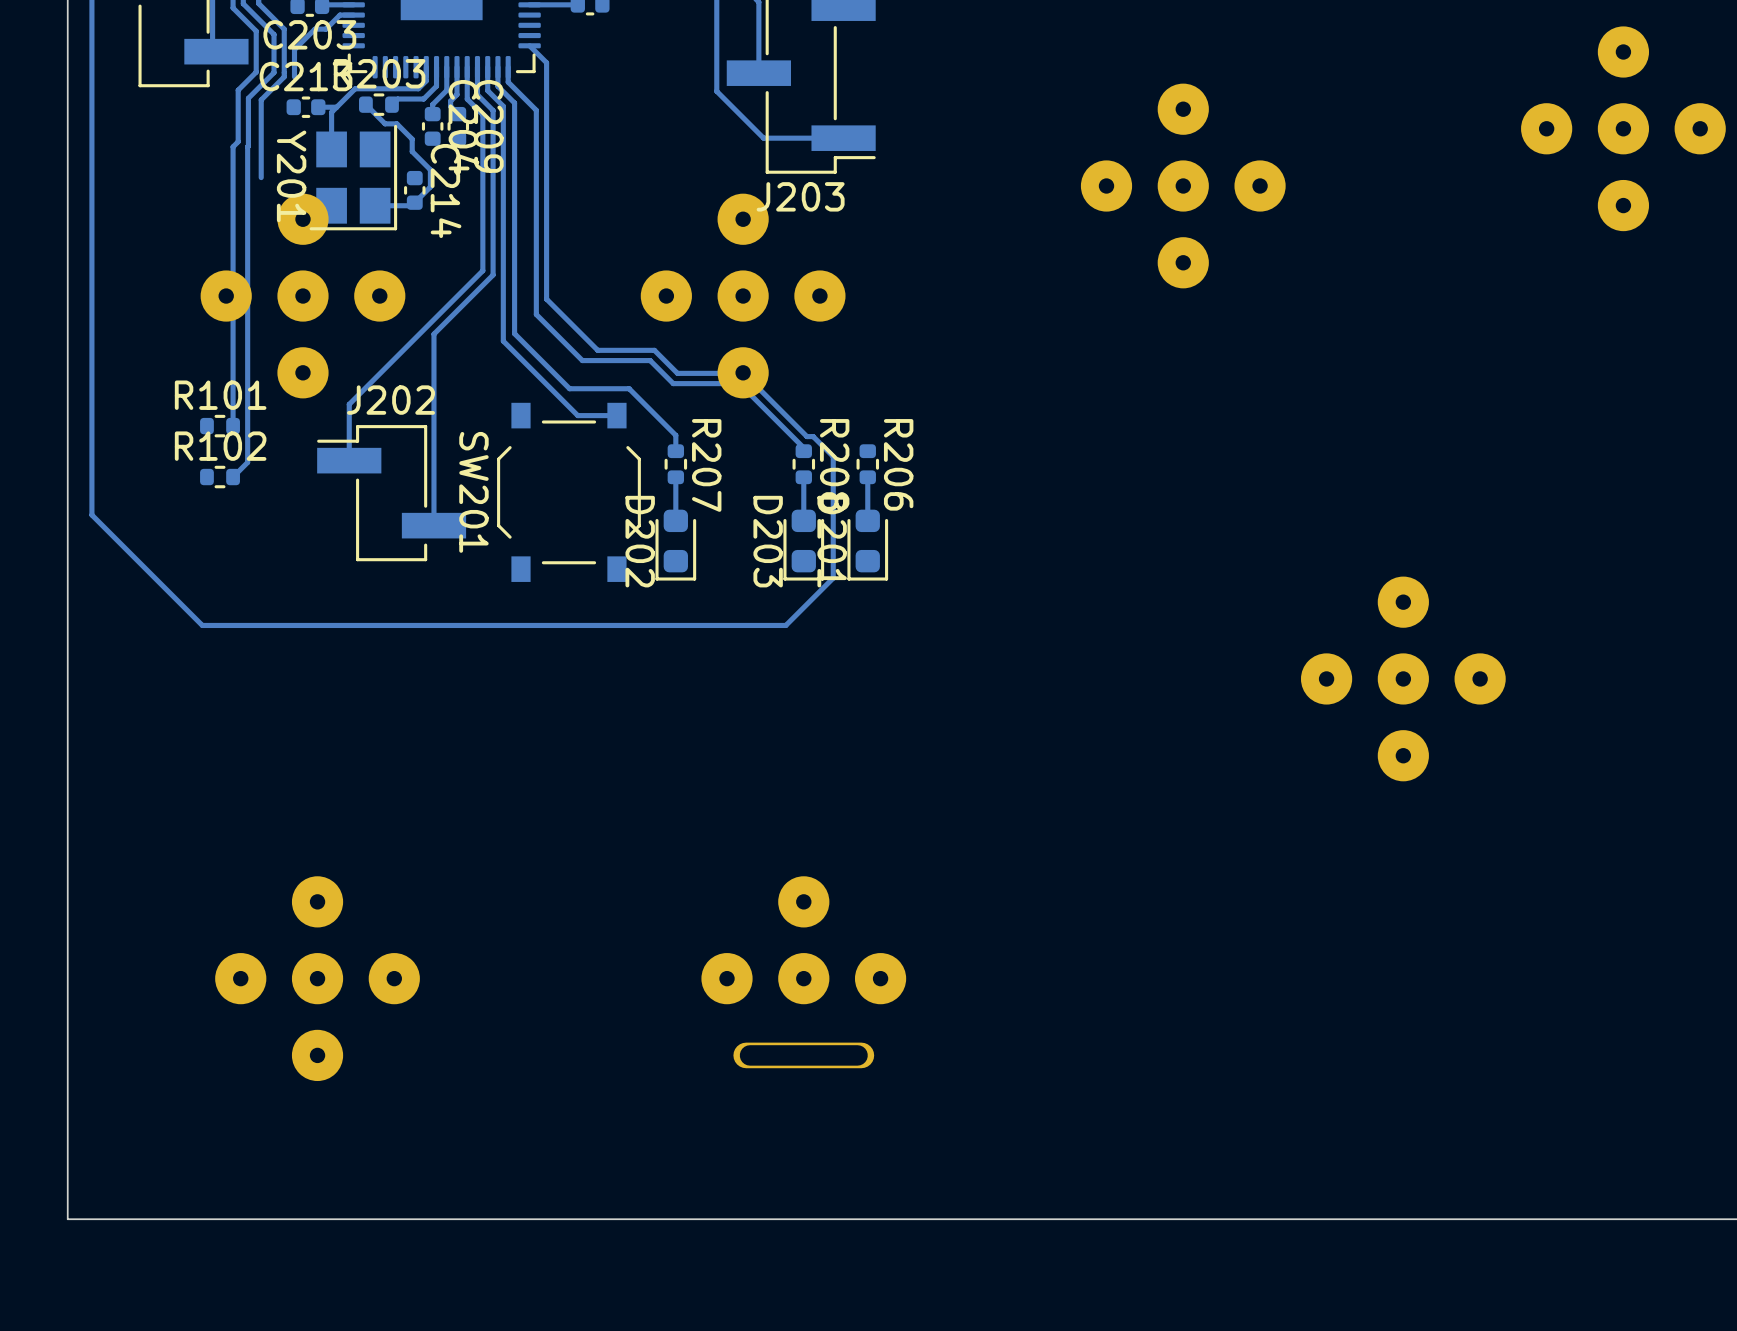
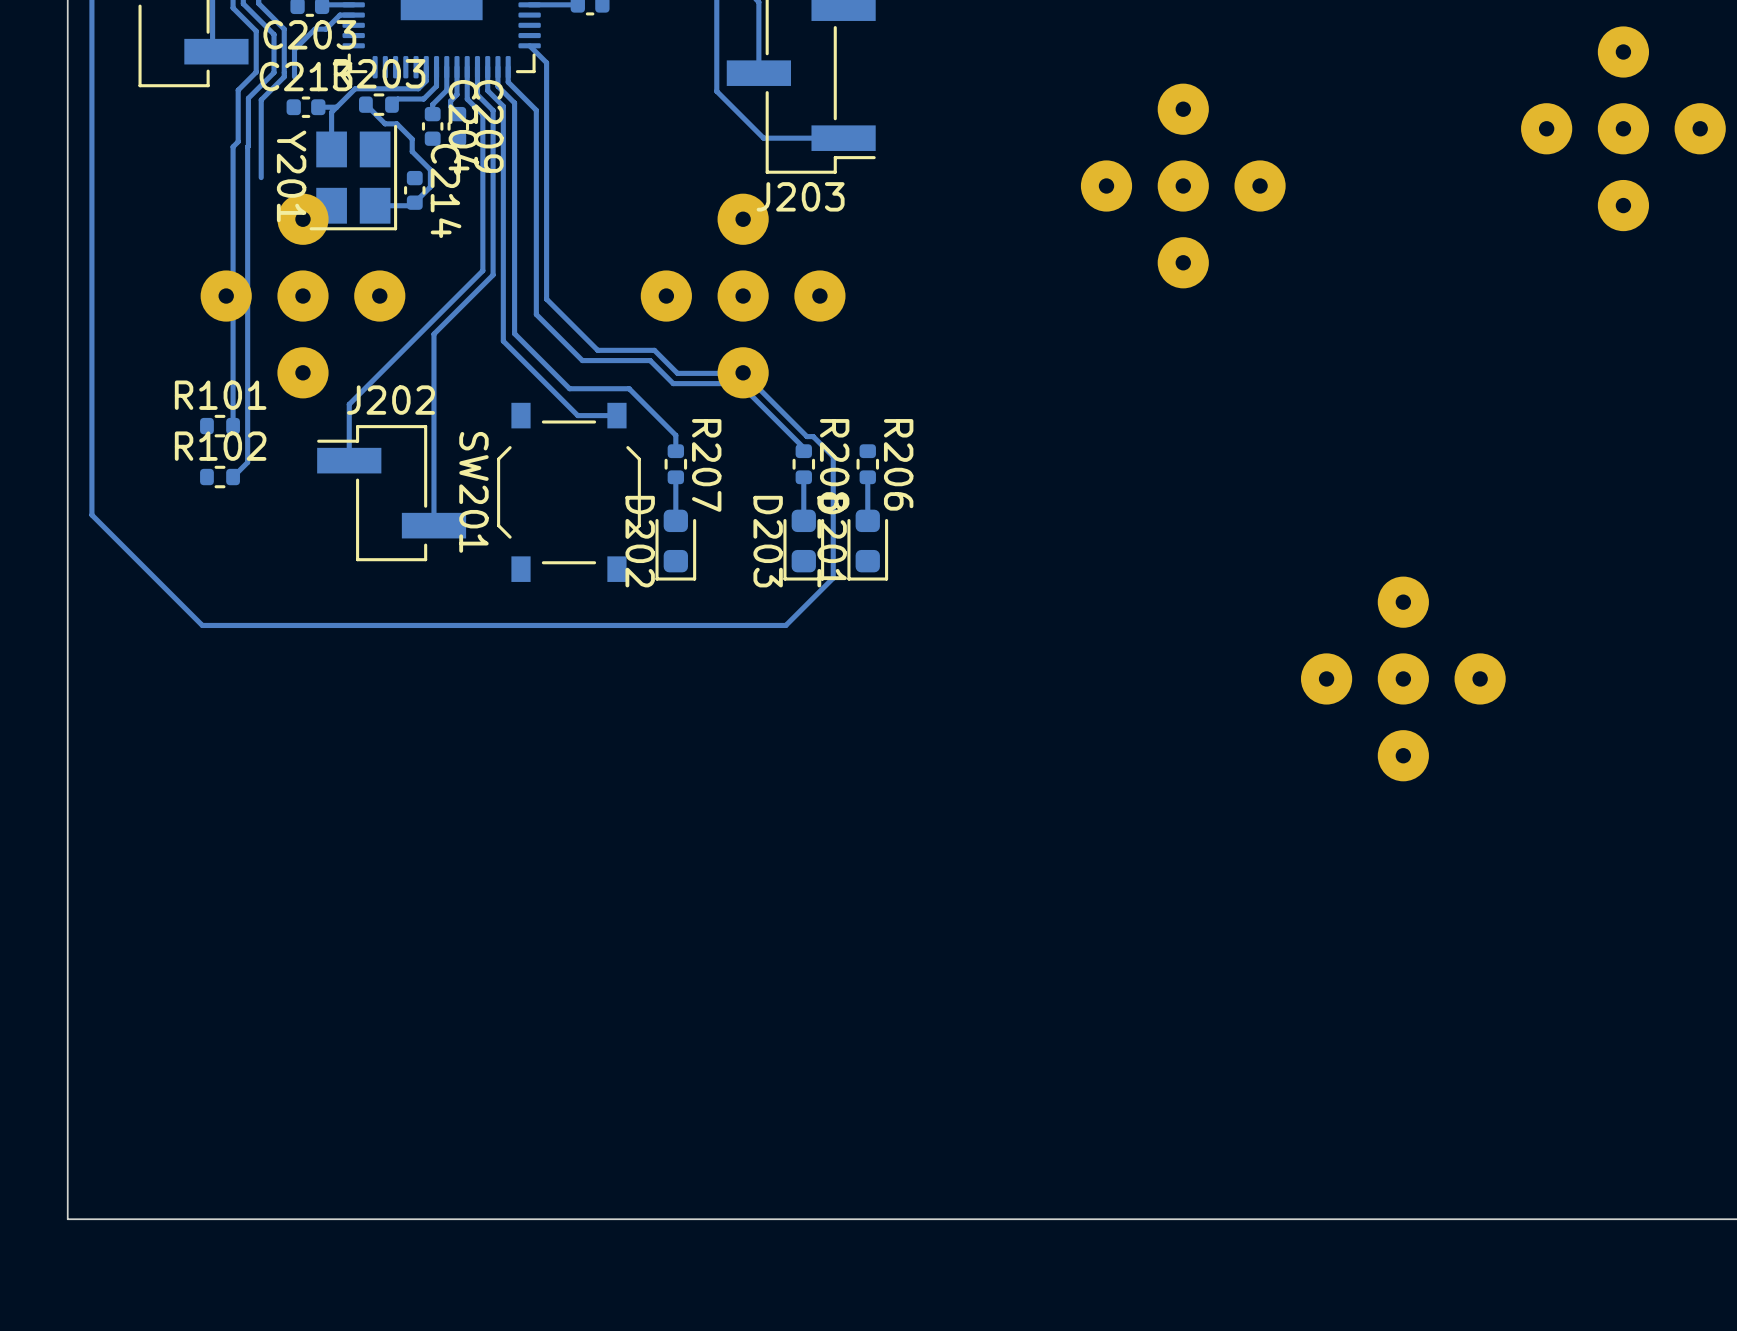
part: (803, 972) -> none
part: (317, 978) -> none

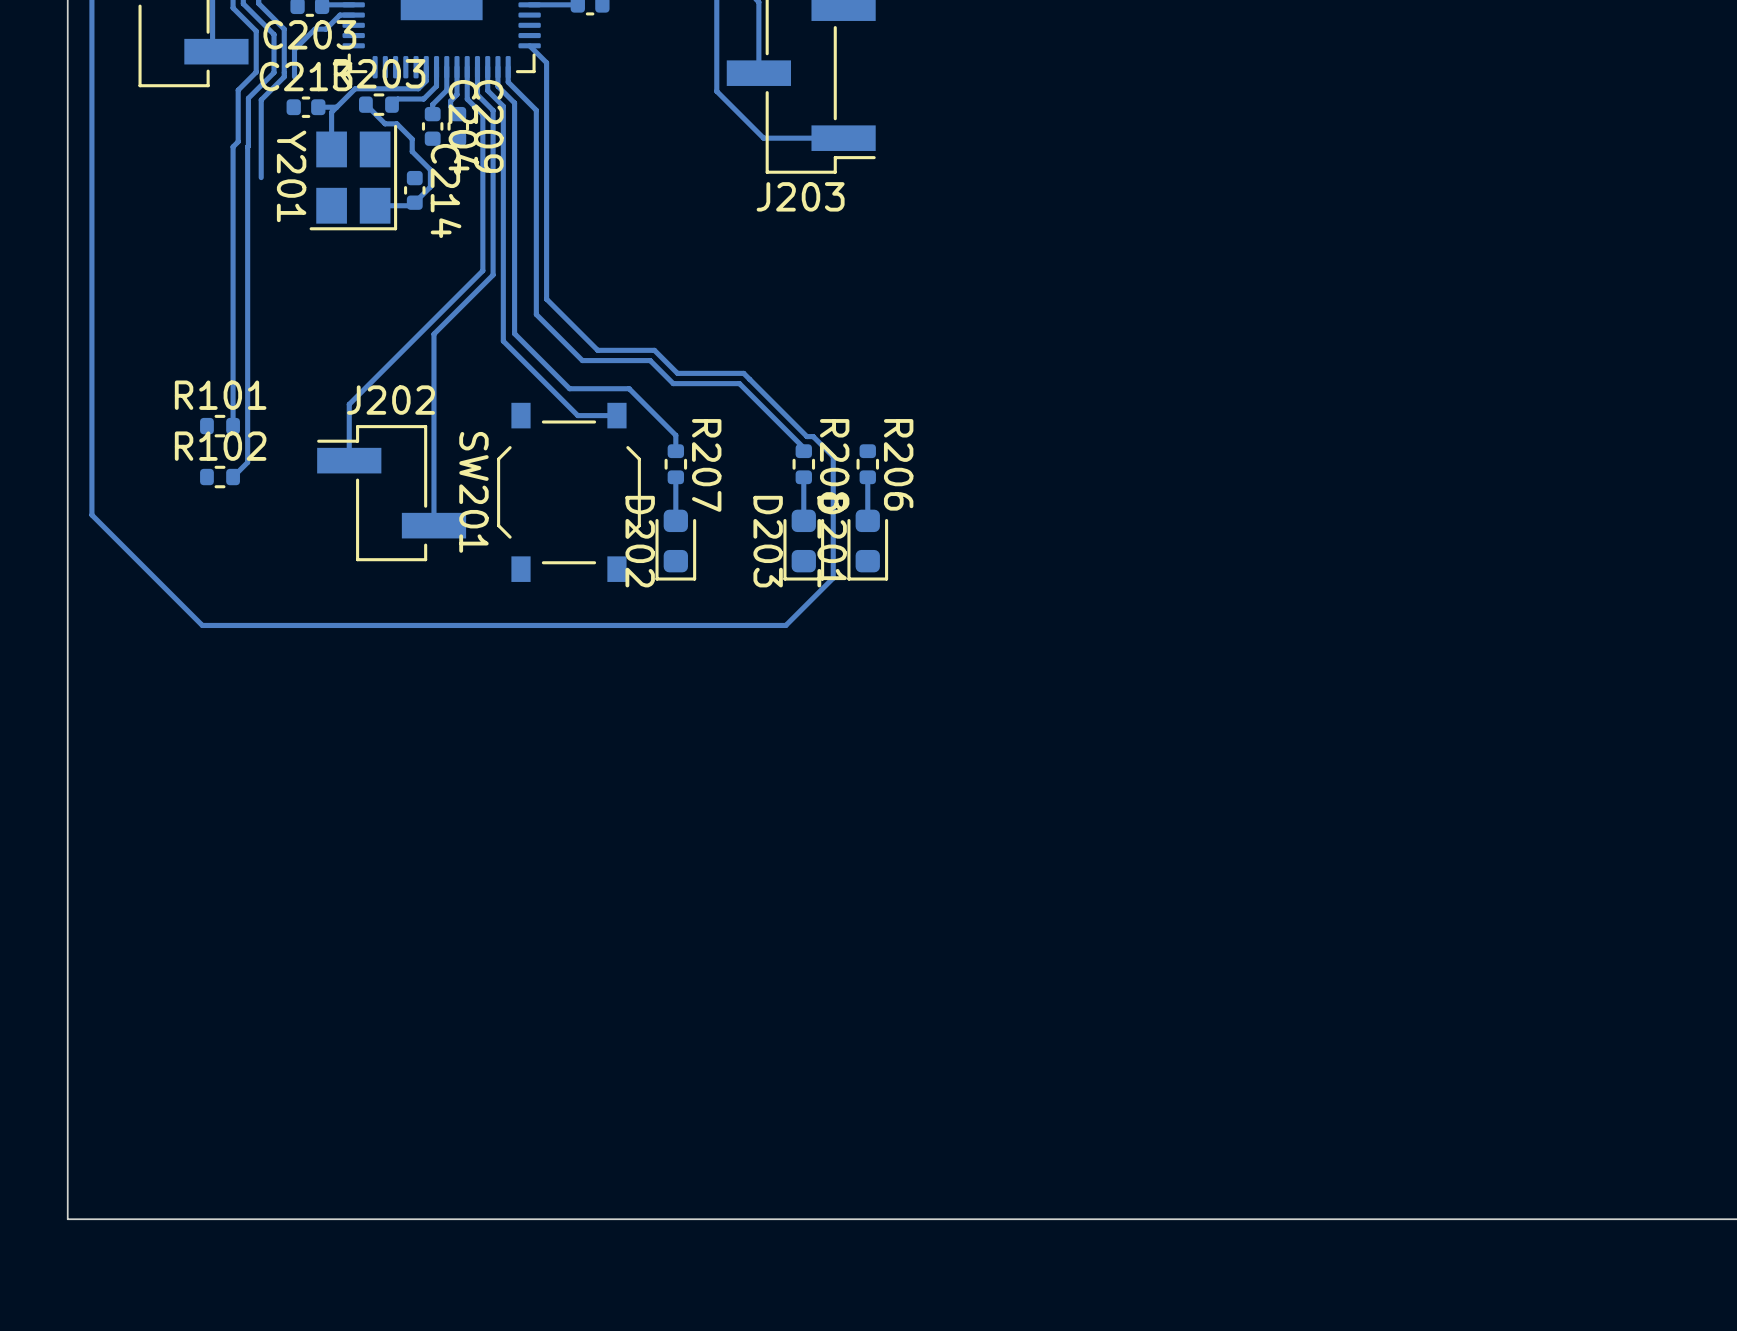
part: (1623, 128) -> none
part: (1183, 185) -> none
part: (303, 296) -> none
part: (743, 296) -> none
part: (1403, 678) -> none

